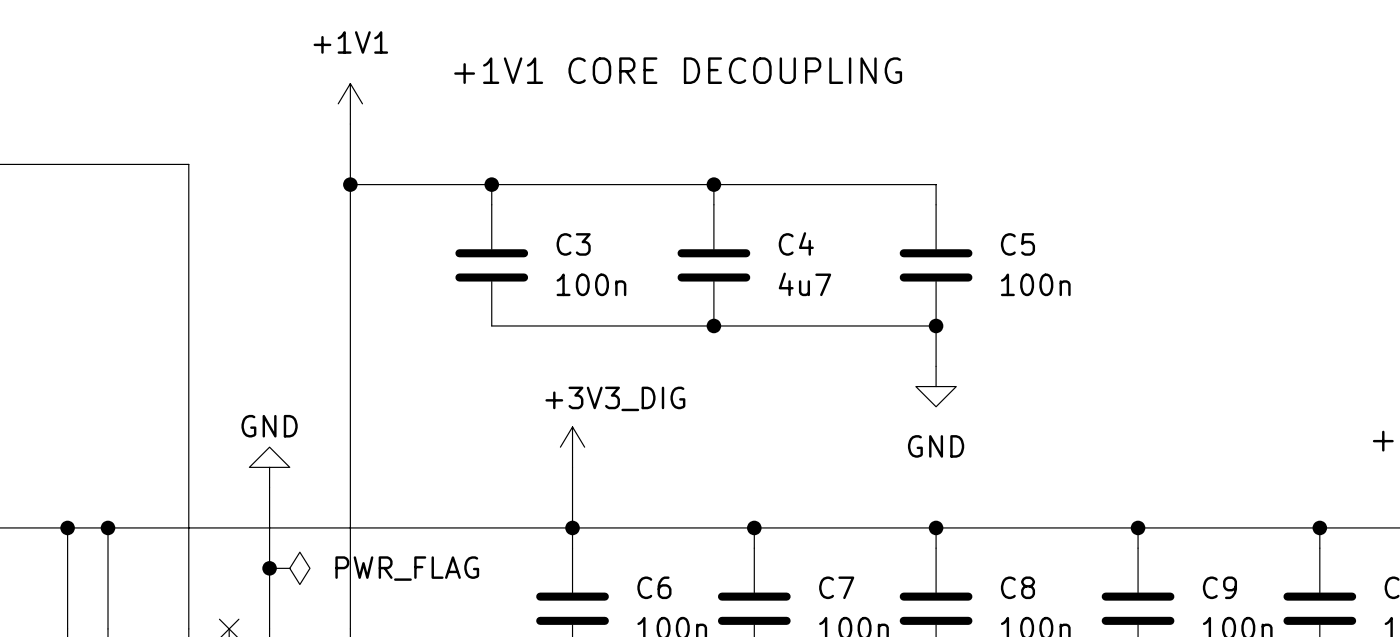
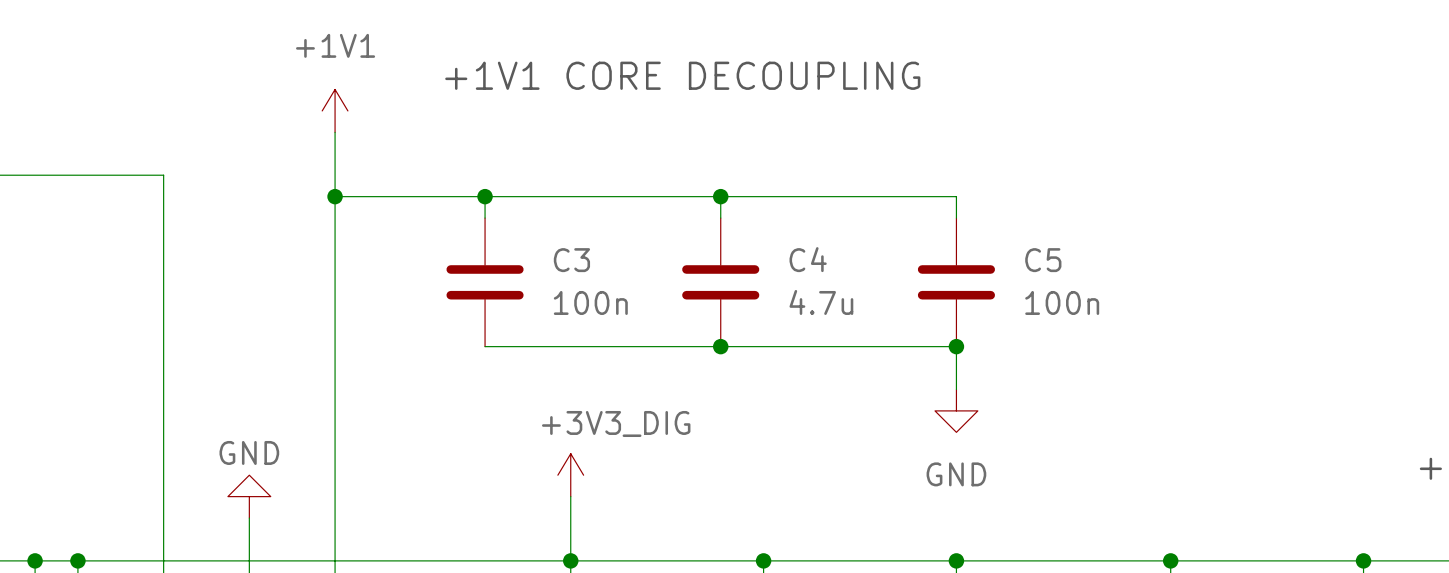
C4 value: 4u7 (804, 284) -> 4.7u (821, 302)

